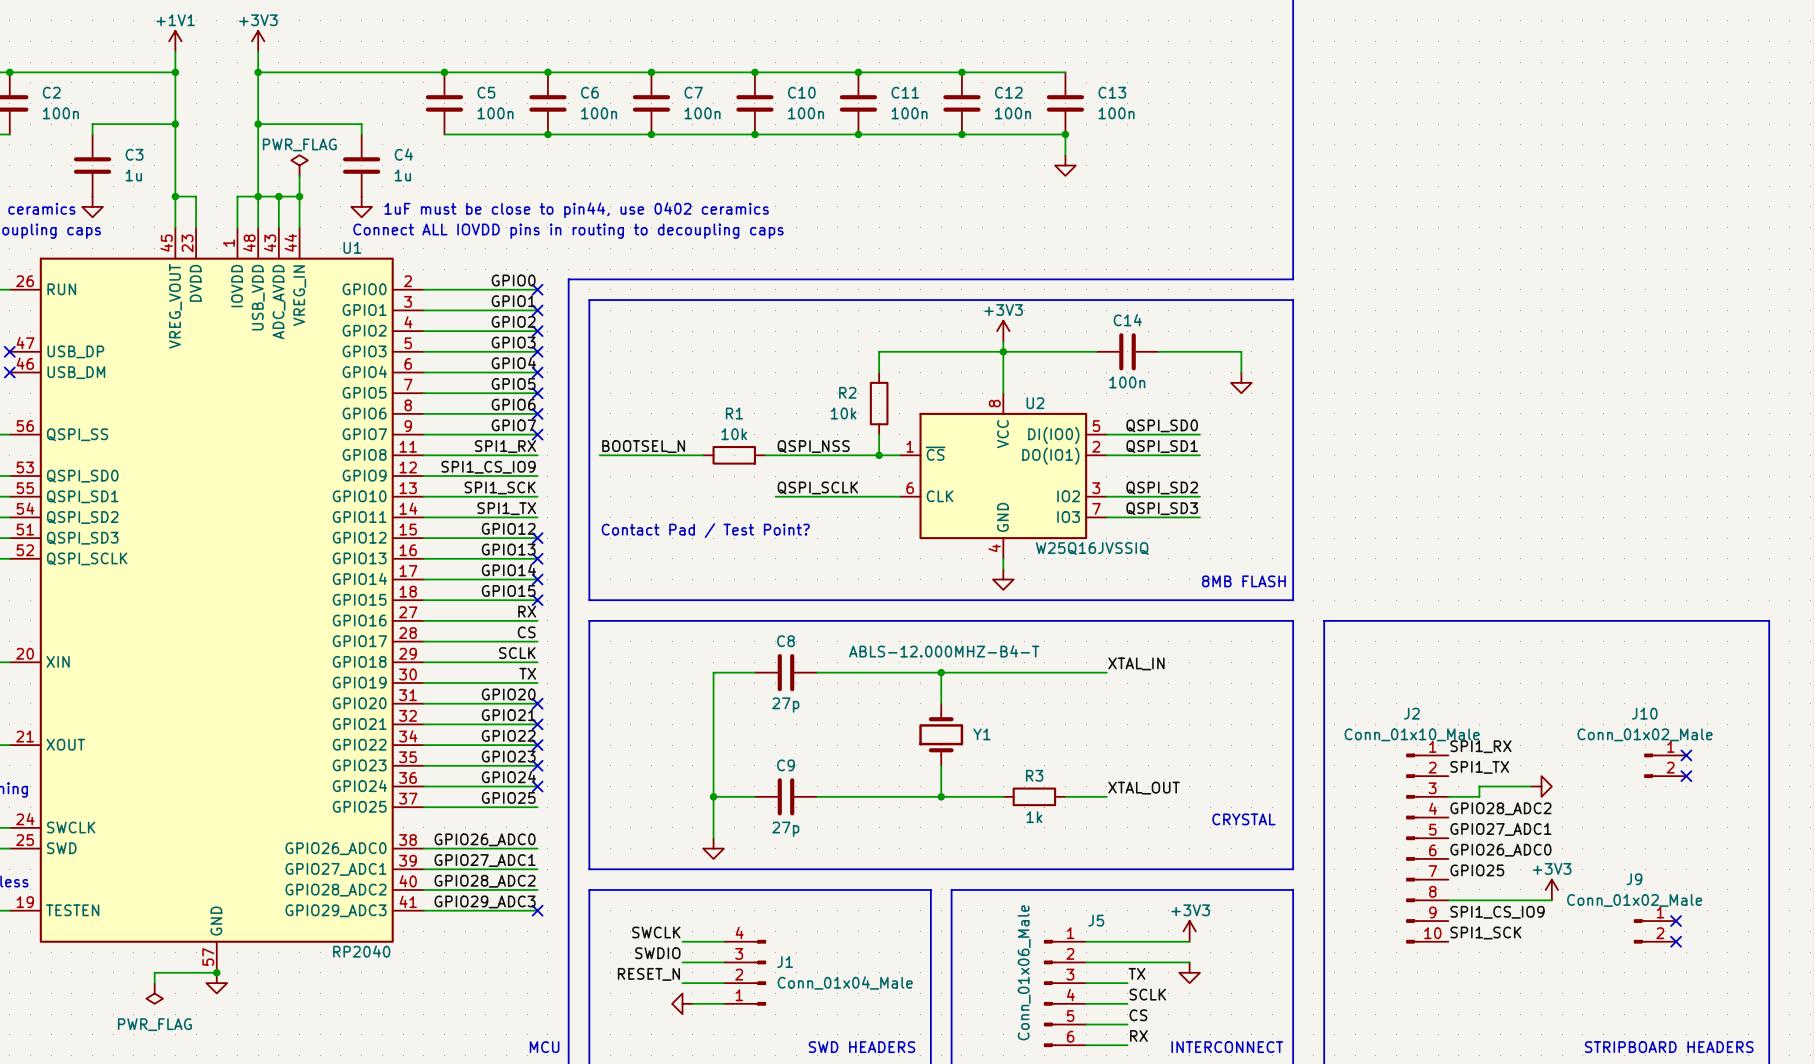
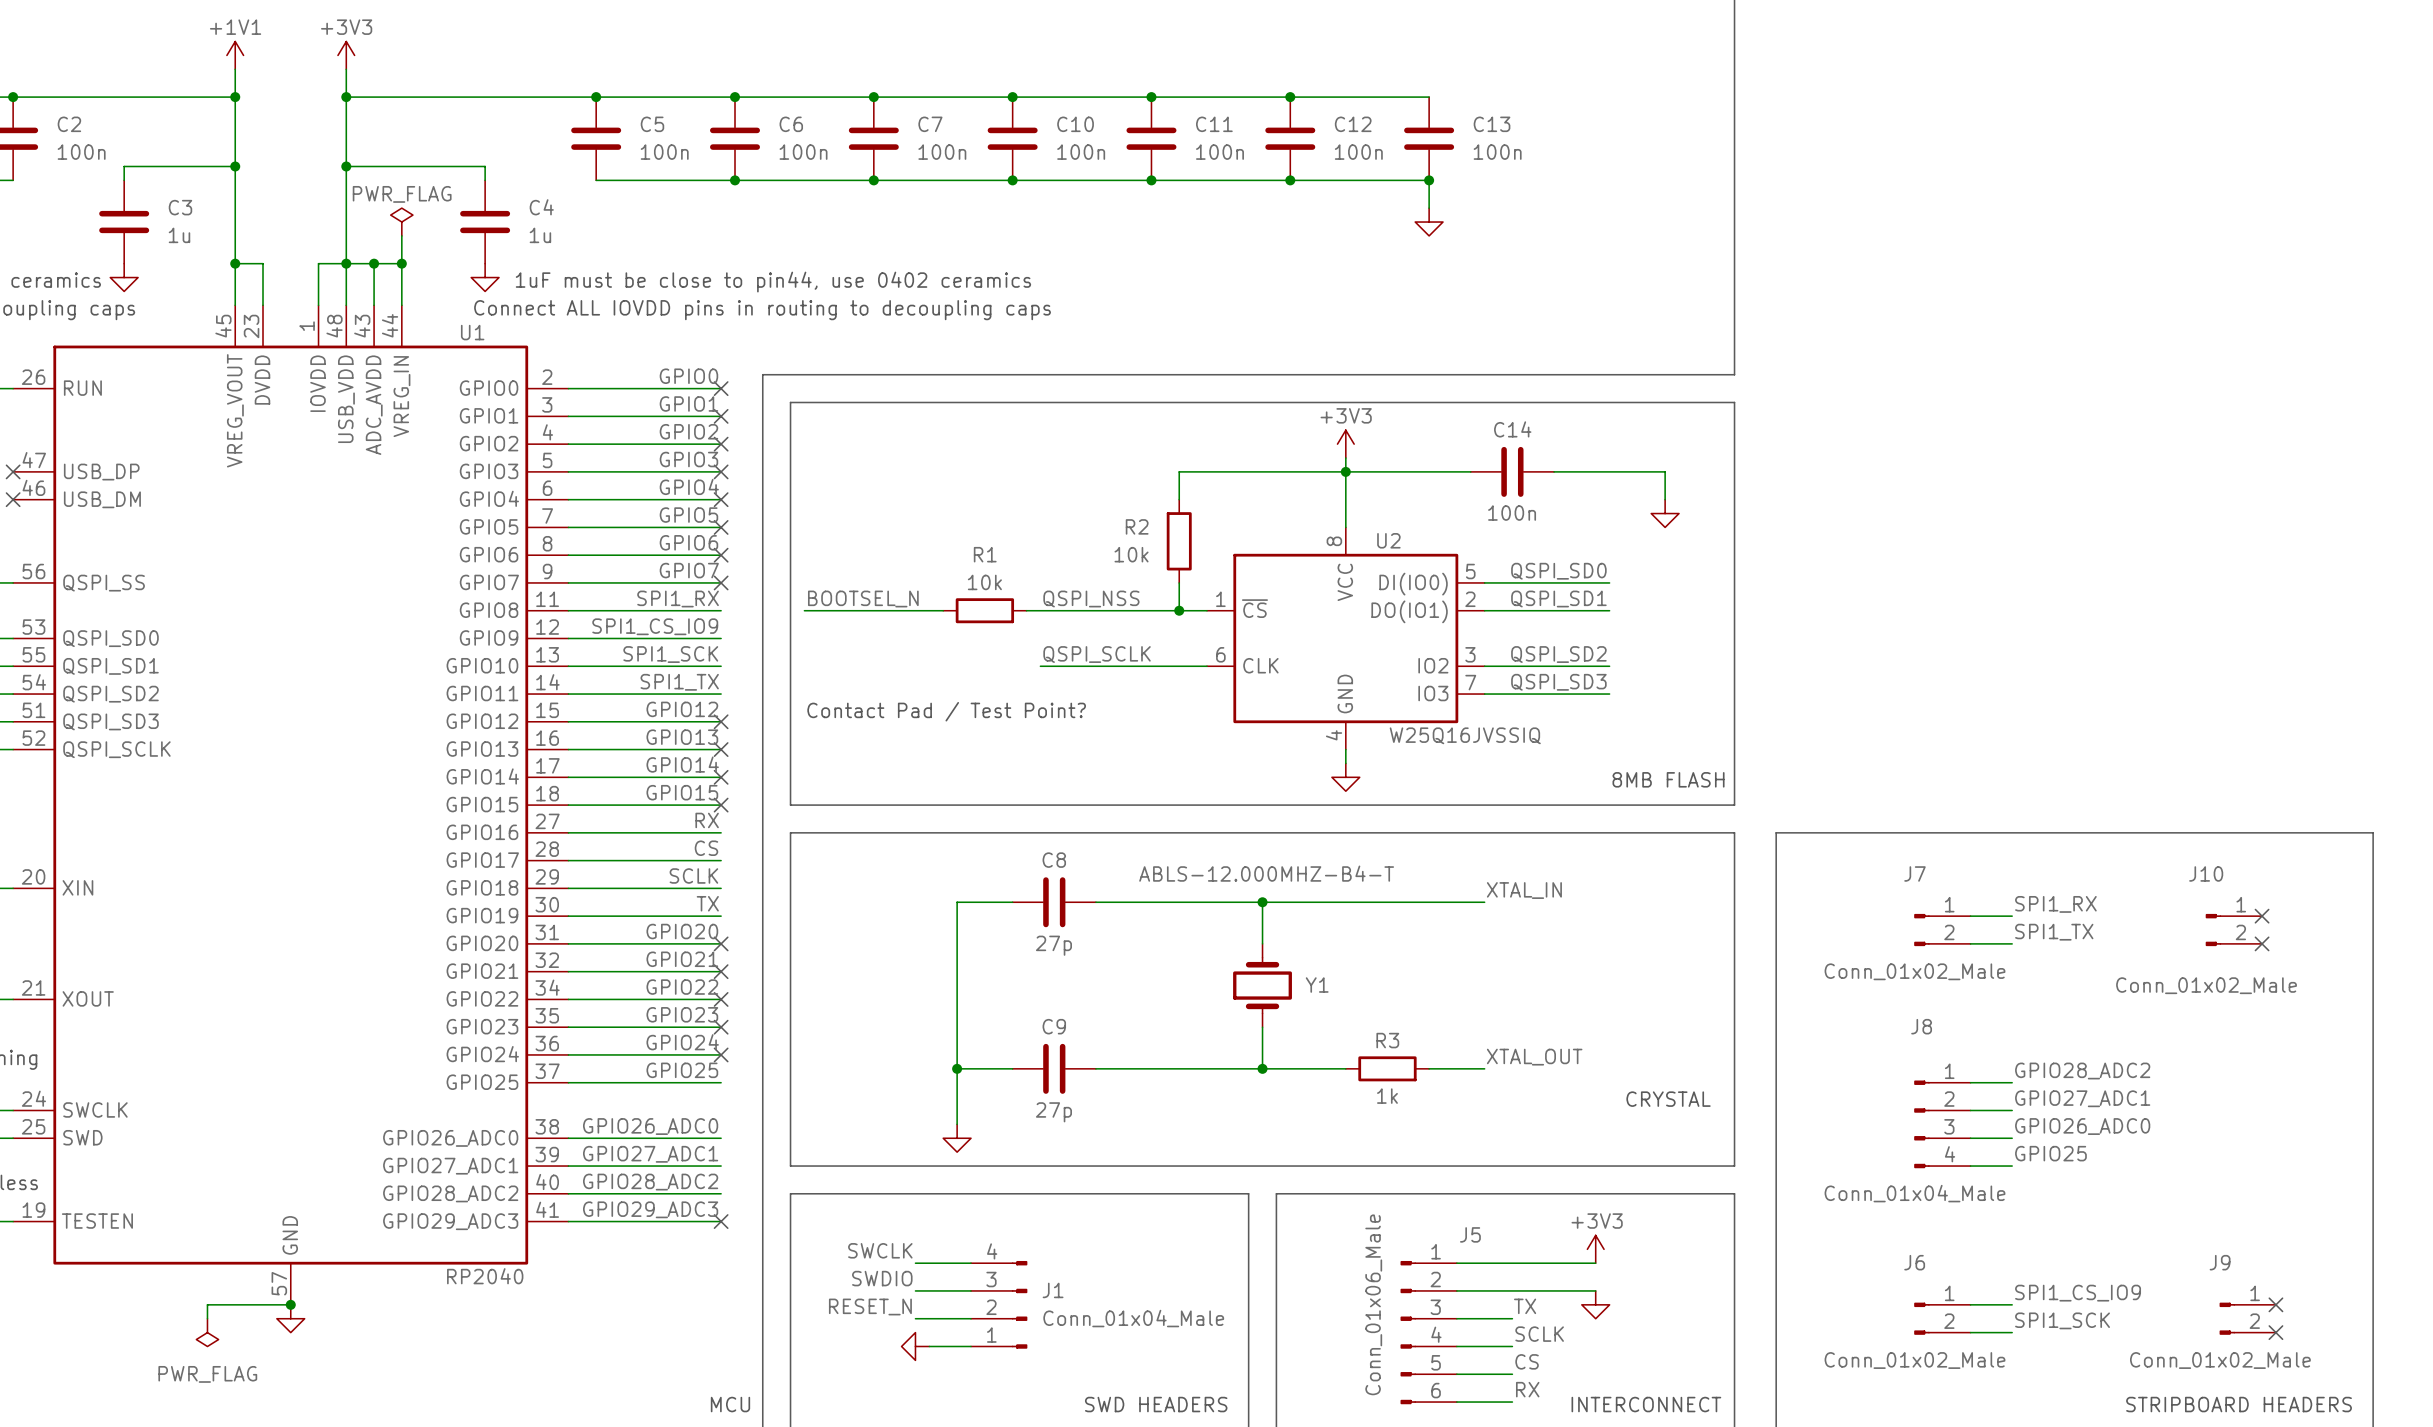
wire: none -> (1970, 916) (2012, 916)
no-connect mark: none -> (2262, 916)
J7: none -> Conn_01x02_Male (1942, 930)
wire: none -> (1970, 943) (2012, 943)
no-connect mark: none -> (2262, 943)
J10 name position: J10 (1644, 713) -> J10 (2206, 873)
label position: SPI1_RX (1480, 746) -> SPI1_RX (2055, 904)
no-connect mark: (1686, 755) -> none
J10 position: (1665, 765) -> (2233, 930)
label position: SPI1_TX (1479, 767) -> SPI1_TX (2054, 932)
no-connect mark: (1686, 776) -> none
wire: (1531, 786) (1479, 786) (1479, 796) (1448, 796) -> none
power symbol: (1541, 786) -> none
wire: none -> (1970, 1082) (2012, 1082)
label position: GPIO28_ADC2 (1500, 808) -> GPIO28_ADC2 (2082, 1071)
wire: none -> (1970, 1110) (2012, 1110)
label position: GPIO27_ADC1 (1500, 829) -> GPIO27_ADC1 (2082, 1098)
J8: none -> Conn_01x04_Male (1942, 1124)
J2: Conn_01x10_Male (1427, 848) -> none
wire: none -> (1970, 1138) (2012, 1138)
label position: GPIO26_ADC0 (1500, 850) -> GPIO26_ADC0 (2082, 1126)
wire: none -> (1970, 1166) (2012, 1166)
label position: GPIO25 (1477, 870) -> GPIO25 (2050, 1153)
J9 name position: J9 (1634, 879) -> J9 (2220, 1262)
power symbol: +3V3 (1551, 889) -> none
wire: (1448, 900) (1551, 900) -> none
J9 value position: Conn_01x02_Male (1634, 900) -> Conn_01x02_Male (2220, 1360)
label position: SPI1_CS_IO9 (1497, 912) -> SPI1_CS_IO9 (2078, 1293)
no-connect mark: (1676, 921) -> none
J9 position: (1655, 931) -> (2247, 1318)
label position: SPI1_SCK (1485, 932) -> SPI1_SCK (2062, 1320)
no-connect mark: (1676, 941) -> none
wire: none -> (1970, 1304) (2012, 1304)
no-connect mark: none -> (2275, 1304)
J6: none -> Conn_01x02_Male (1942, 1318)
wire: none -> (1970, 1332) (2012, 1332)
no-connect mark: none -> (2275, 1332)

